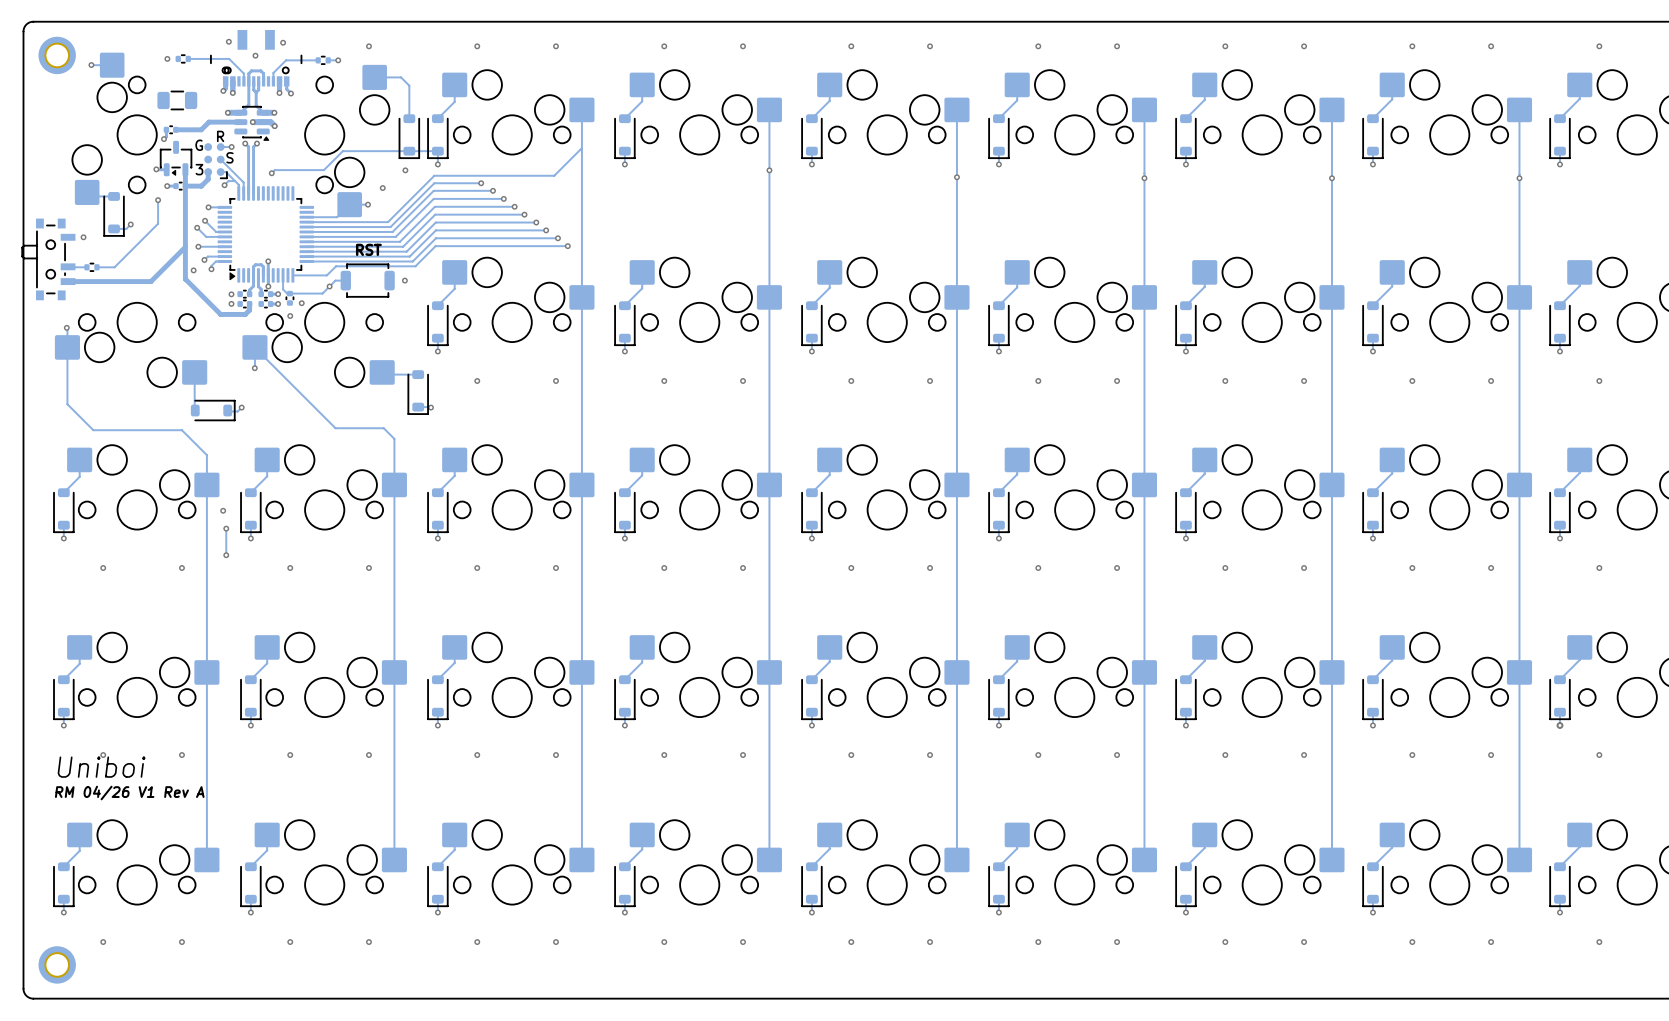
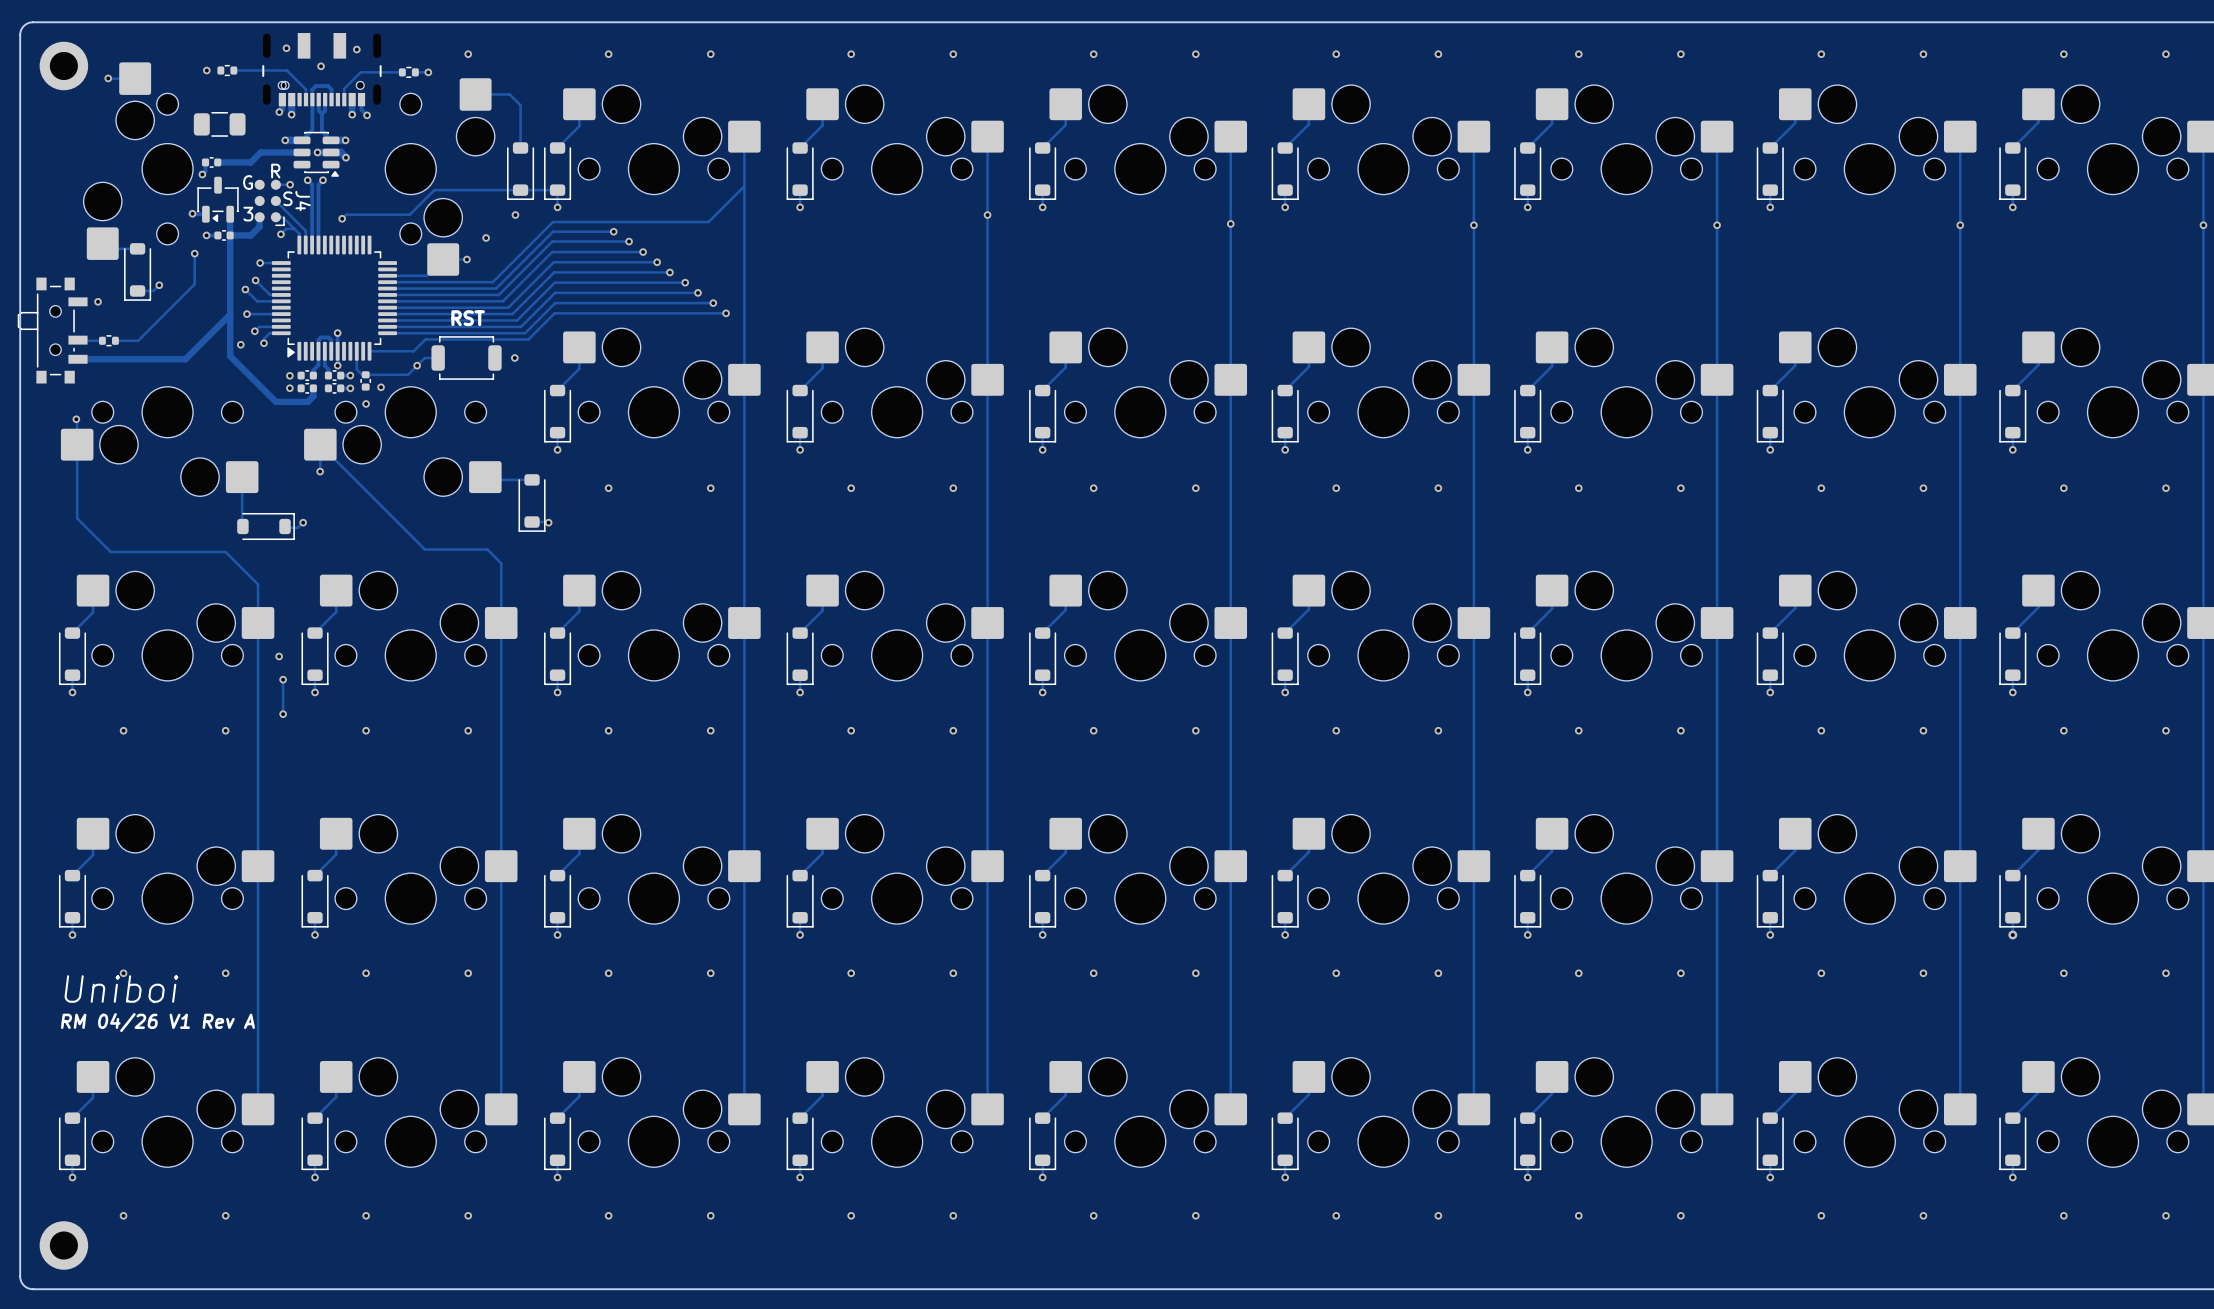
J4 name: none -> J4 (303, 200)

